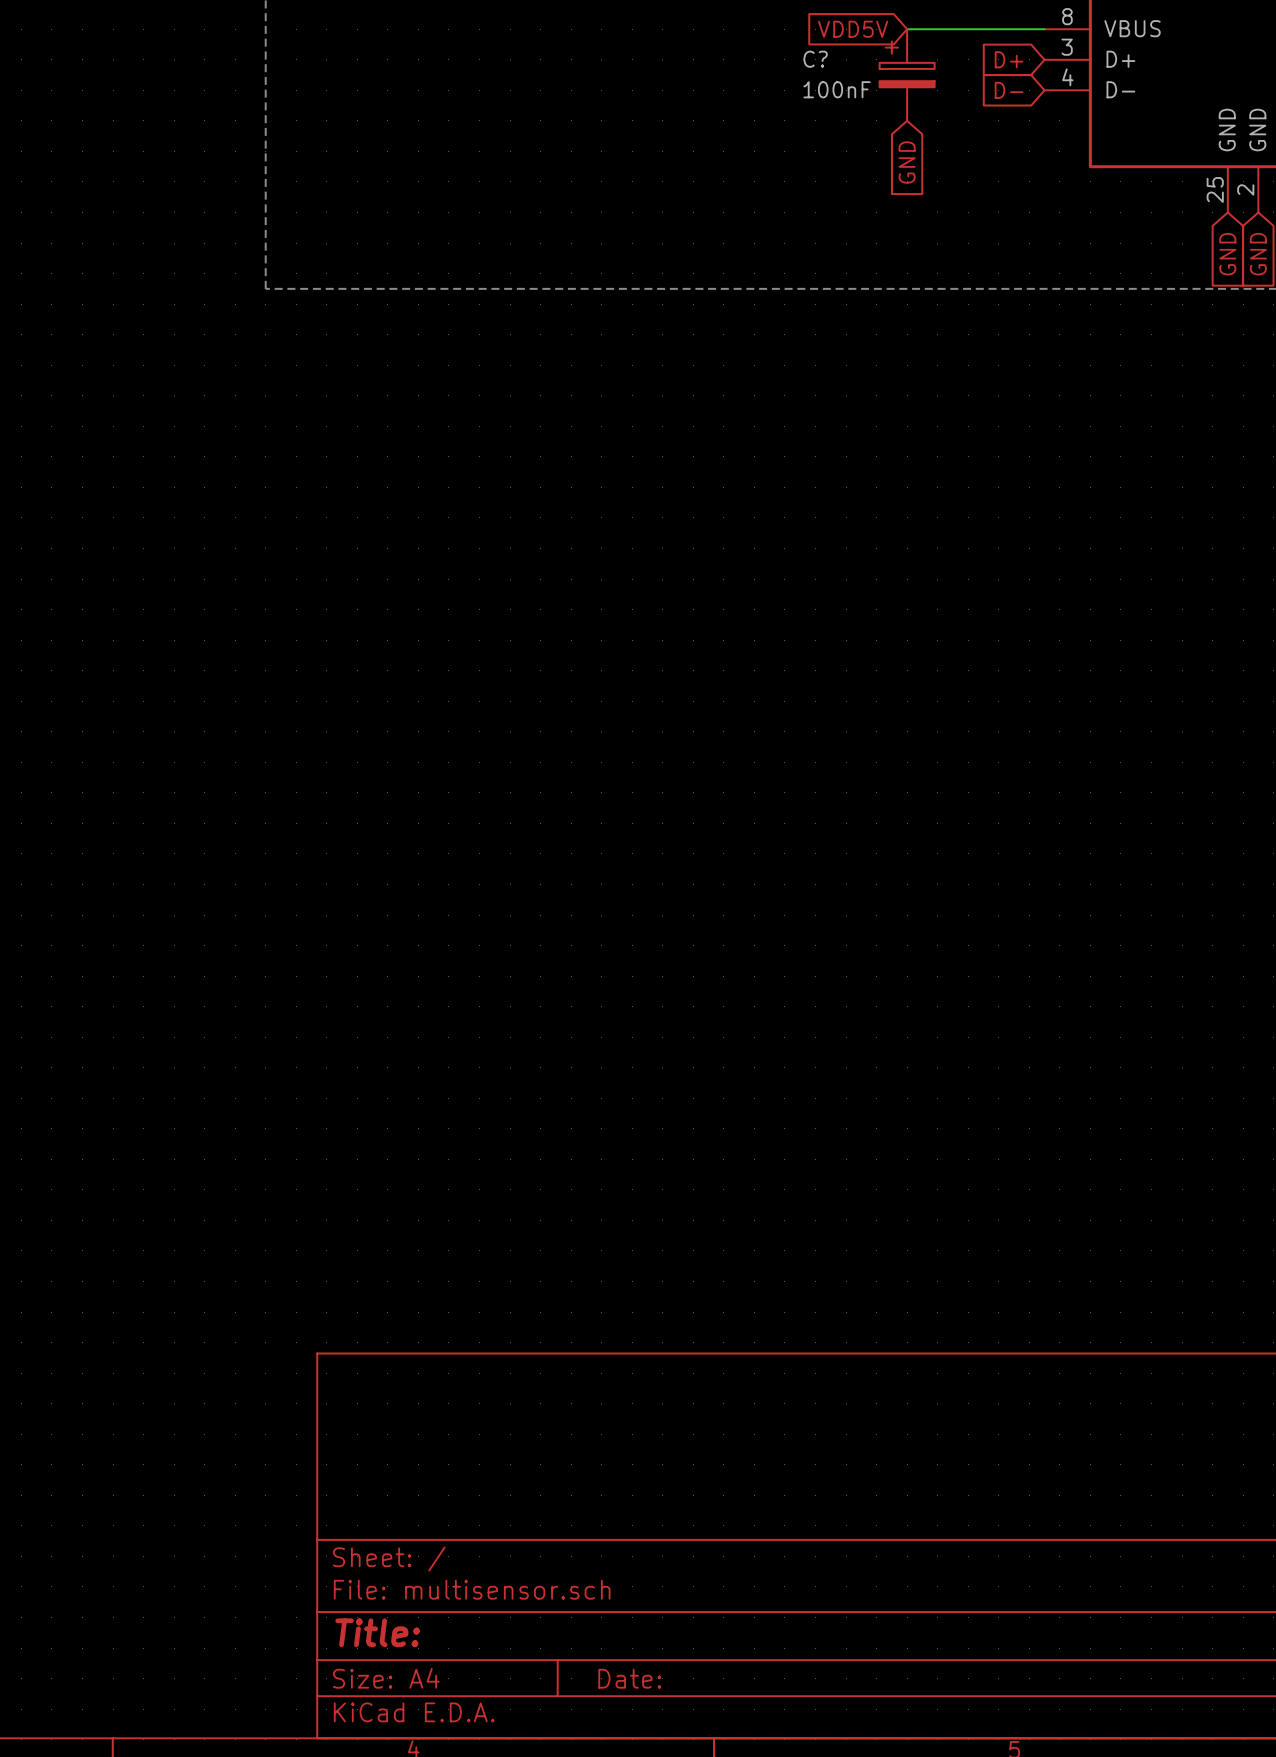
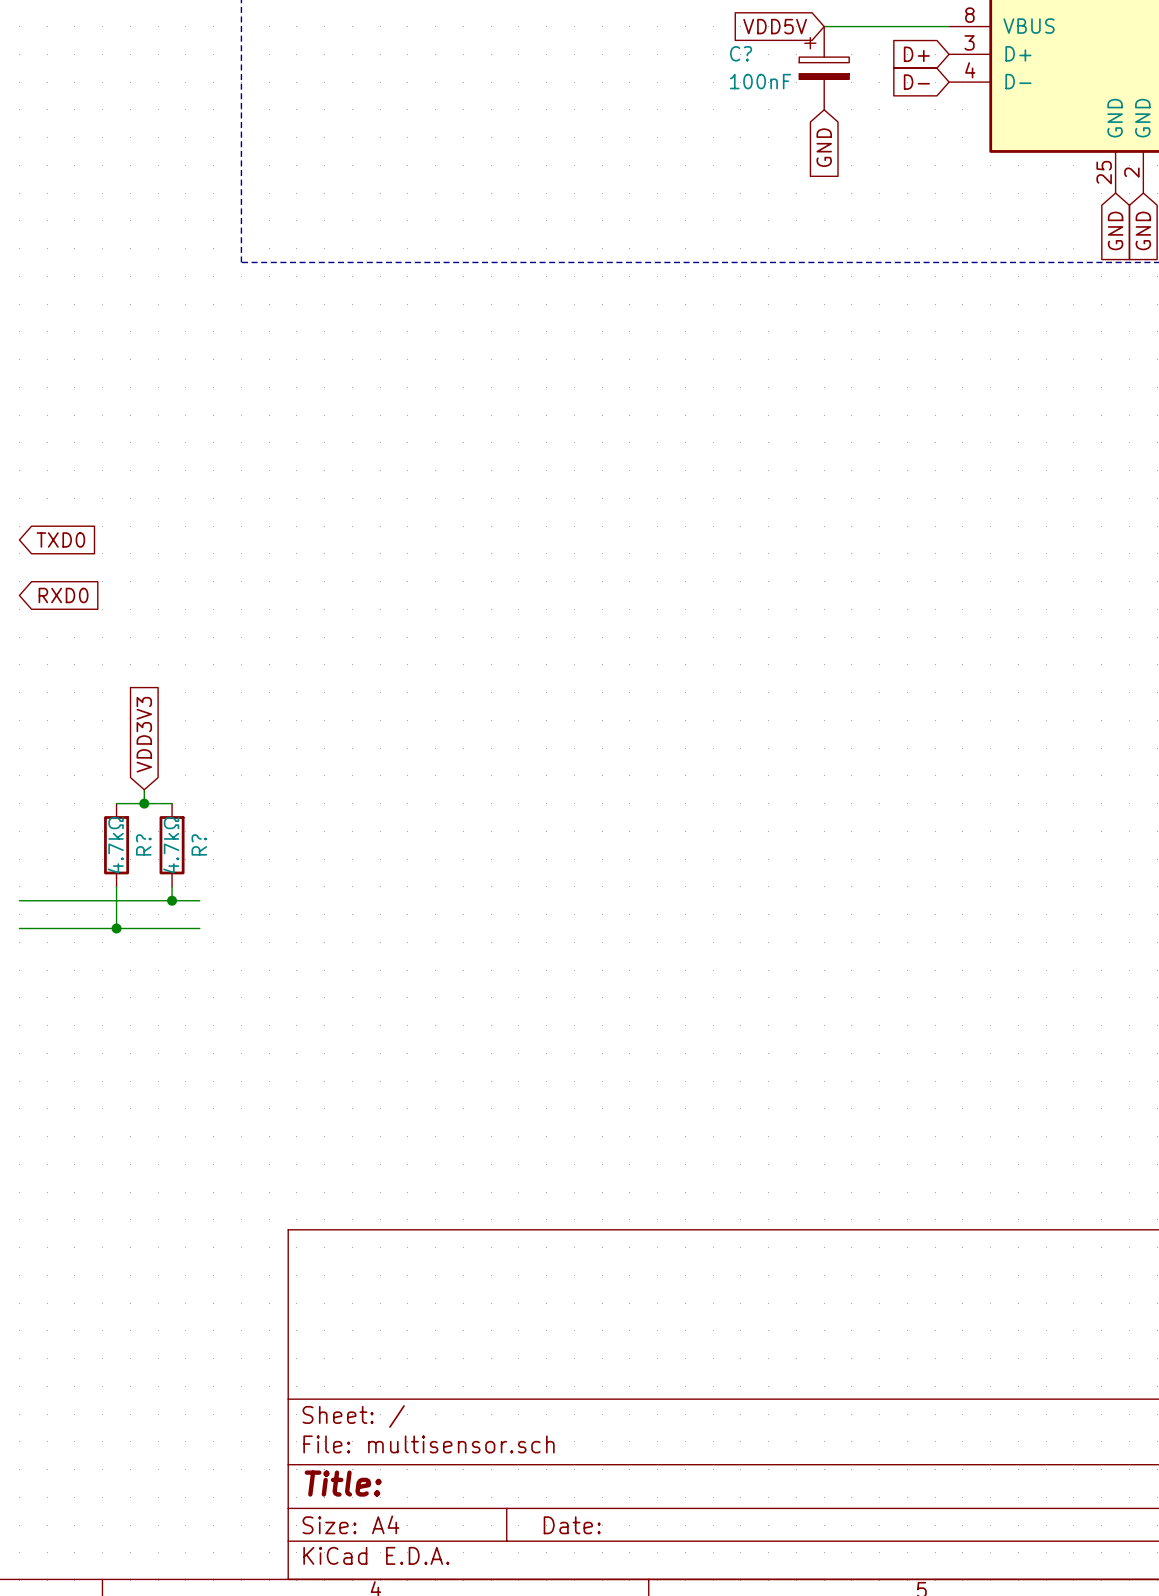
global label: none -> TXD0 (60, 539)
global label: none -> RXD0 (63, 595)
global label: none -> VDD3V3 (144, 734)
wire: none -> (144, 789) (144, 803)
wire: none -> (116, 803) (172, 803)
junction: none -> (144, 803)
R?: none -> 4.7kΩ (116, 845)
R?: none -> 4.7kΩ (172, 845)
wire: none -> (116, 886) (116, 928)
wire: none -> (172, 886) (172, 900)
wire: none -> (19, 900) (199, 900)
junction: none -> (172, 900)
wire: none -> (19, 928) (199, 928)
junction: none -> (116, 928)

